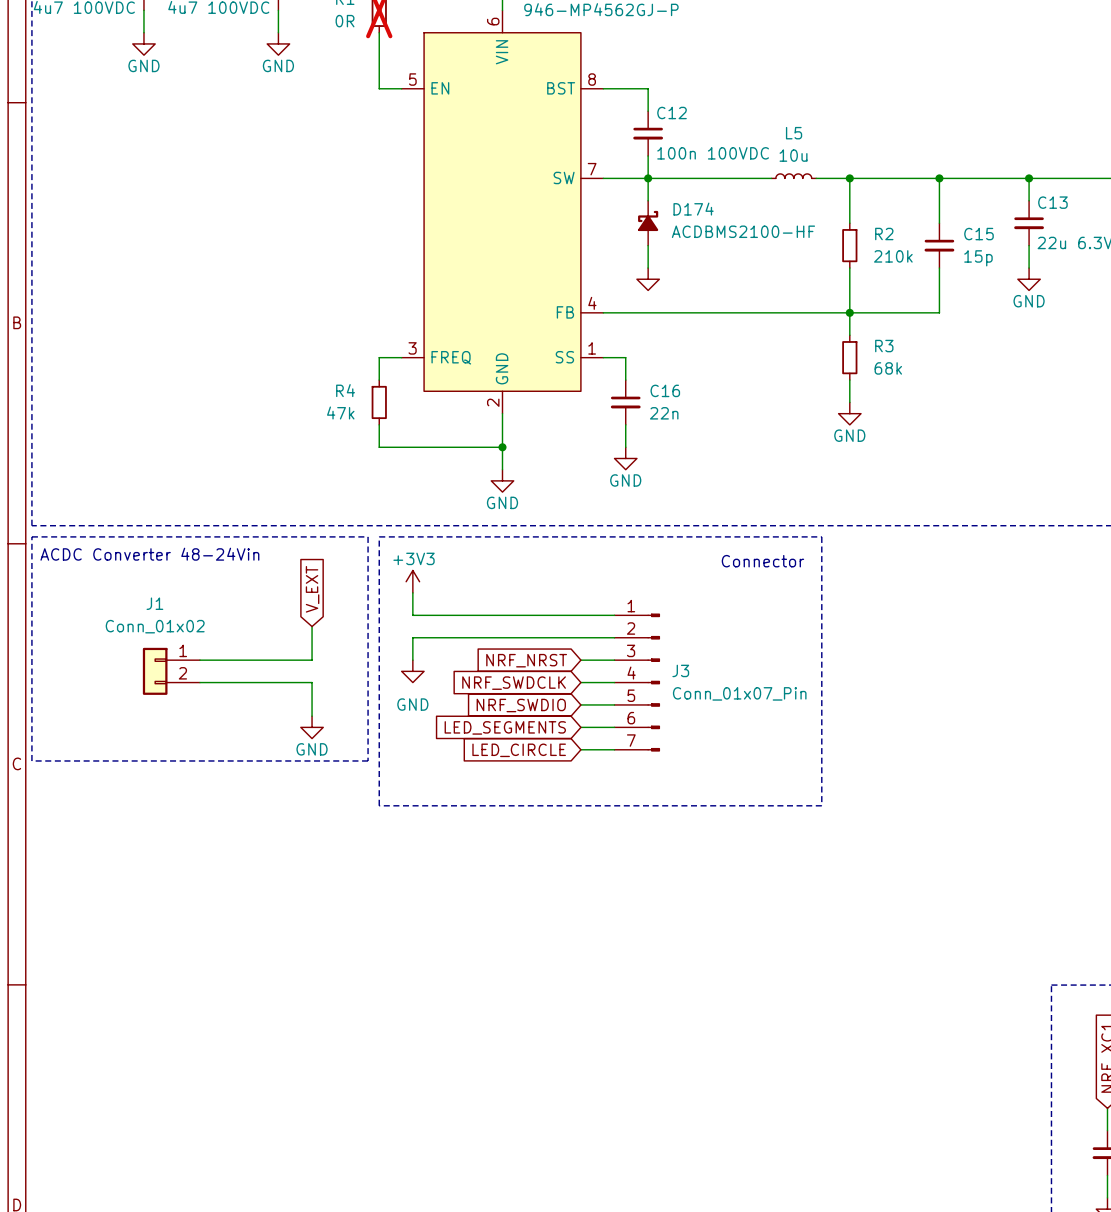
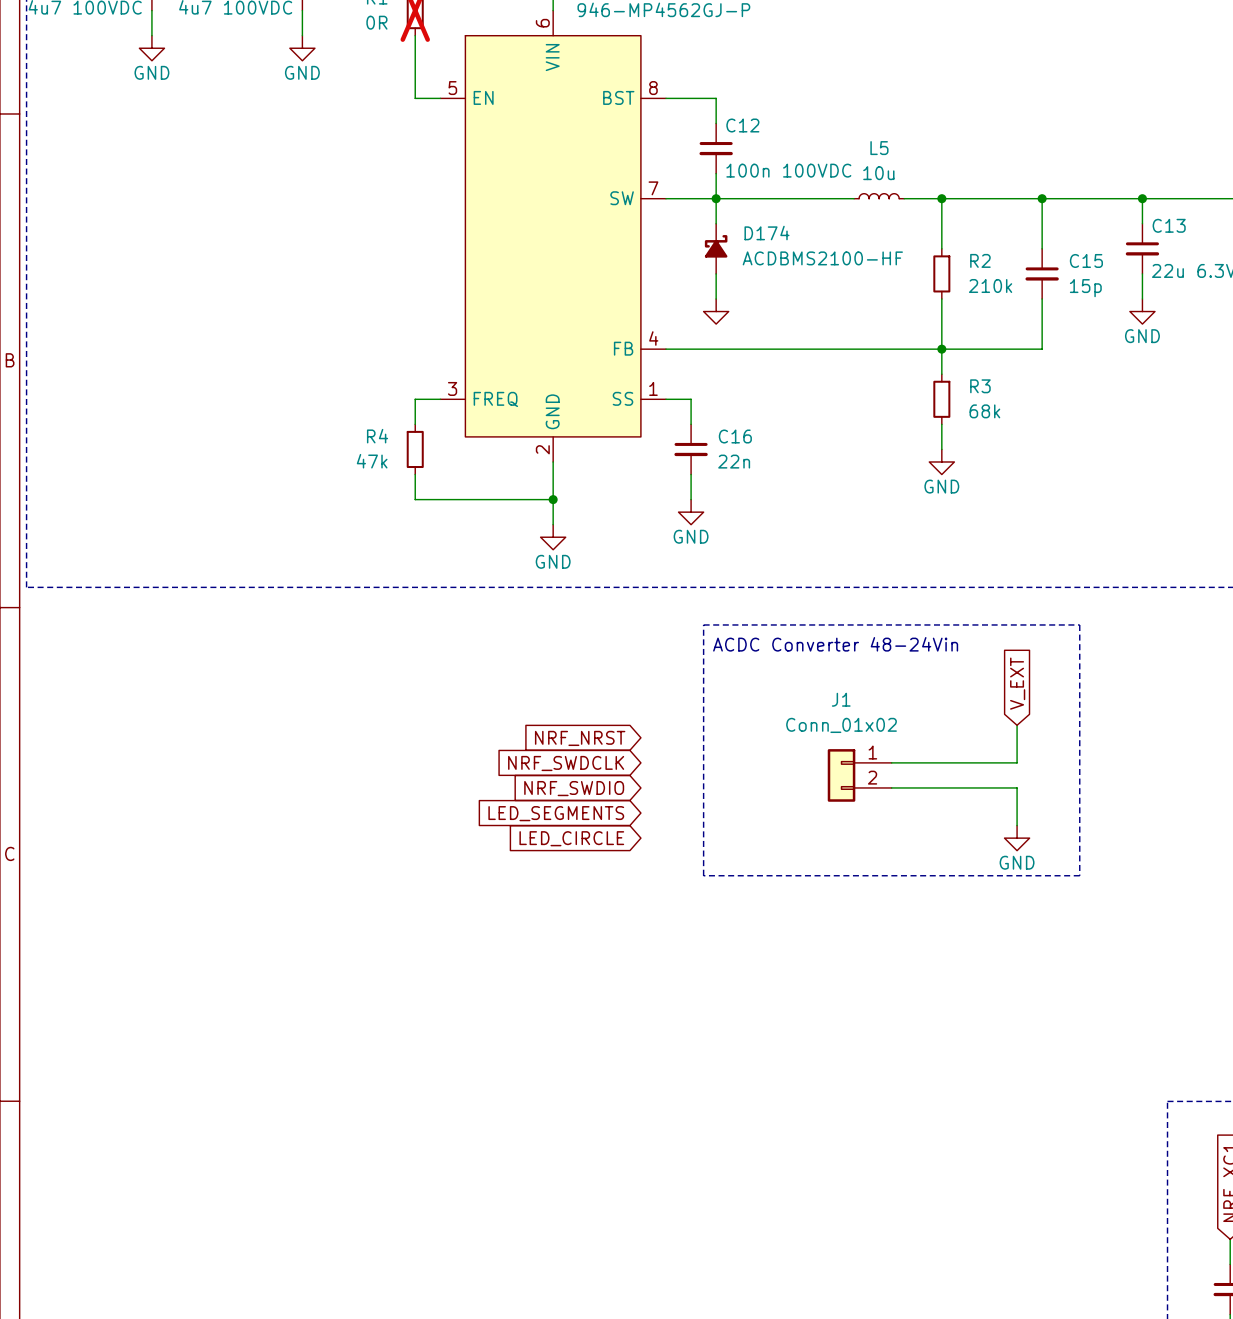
line: (31, 536) (368, 536) (368, 760) (31, 760) (31, 536) -> none
line: (379, 536) (821, 536) (821, 805) (379, 805) (379, 536) -> none
text: ACDC Converter 48-24Vin (149, 554) -> none
line: none -> (703, 624) (1079, 624) (1079, 875) (703, 875) (703, 624)
text: Connector (762, 561) -> none
text: none -> ACDC Converter 48-24Vin (835, 644)
power symbol: +3V3 (412, 581) -> none
global label: V_EXT (312, 589) -> none
wire: (412, 592) (412, 615) (614, 615) -> none
global label: none -> V_EXT (1017, 683)
wire: (312, 626) (312, 660) (199, 660) -> none
wire: (614, 637) (412, 637) (412, 660) -> none
wire: none -> (1017, 725) (1017, 762) (891, 762)
wire: (580, 660) (614, 660) -> none
J1 position: (171, 671) -> (859, 775)
power symbol: GND (412, 671) -> none
wire: (199, 682) (312, 682) (312, 716) -> none
wire: (580, 682) (614, 682) -> none
J3: Conn_01x07_Pin (637, 682) -> none
wire: (580, 704) (614, 704) -> none
wire: none -> (891, 787) (1017, 787) (1017, 825)
power symbol: GND (312, 727) -> none
wire: (580, 727) (614, 727) -> none
wire: (580, 749) (614, 749) -> none
power symbol: none -> GND (1017, 838)

